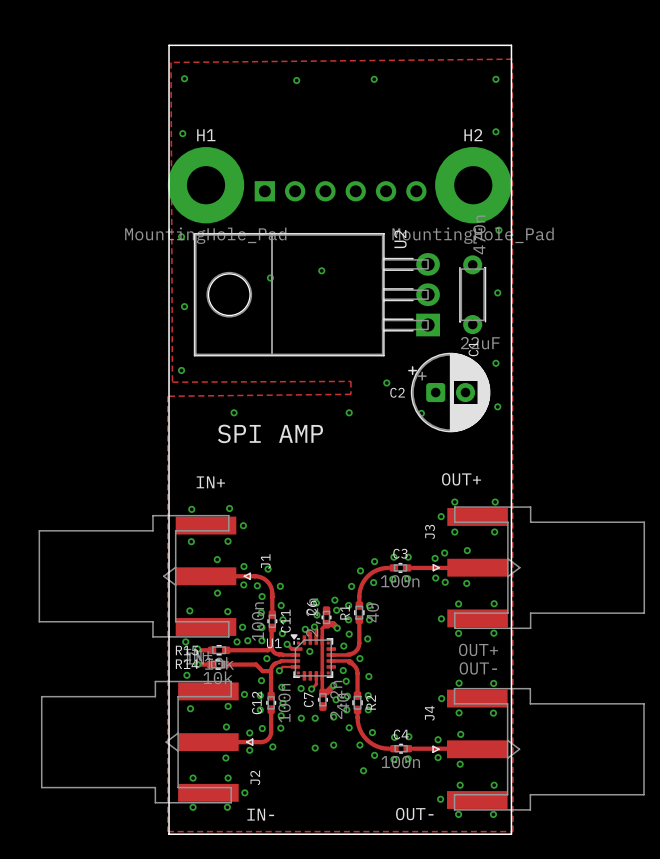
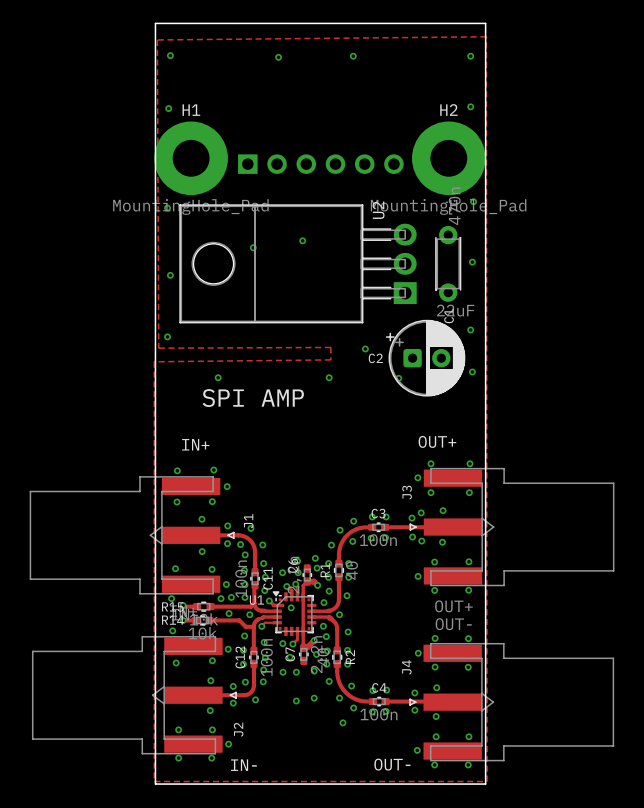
via: none -> (282, 572)
via: none -> (229, 613)
via: none -> (290, 657)

